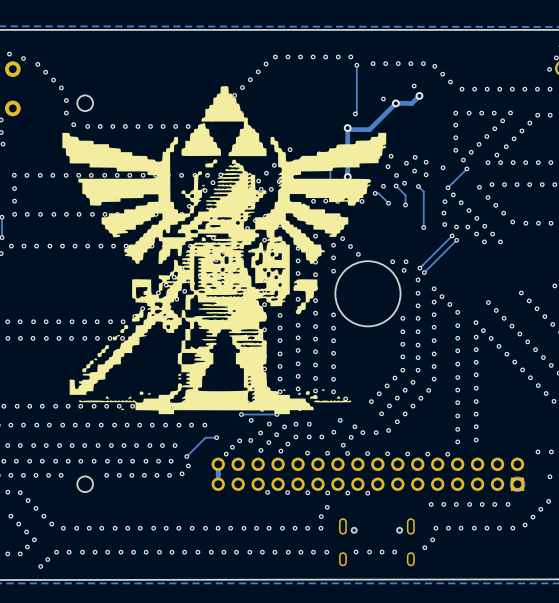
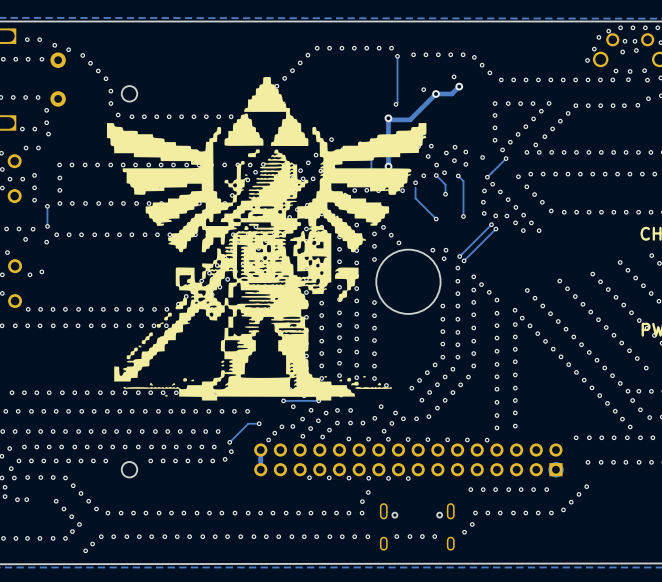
track: (375, 193) (378, 193) (388, 203) -> none
track: none -> (415, 187) (415, 198) (436, 219)
via position: (388, 203) -> (436, 219)

